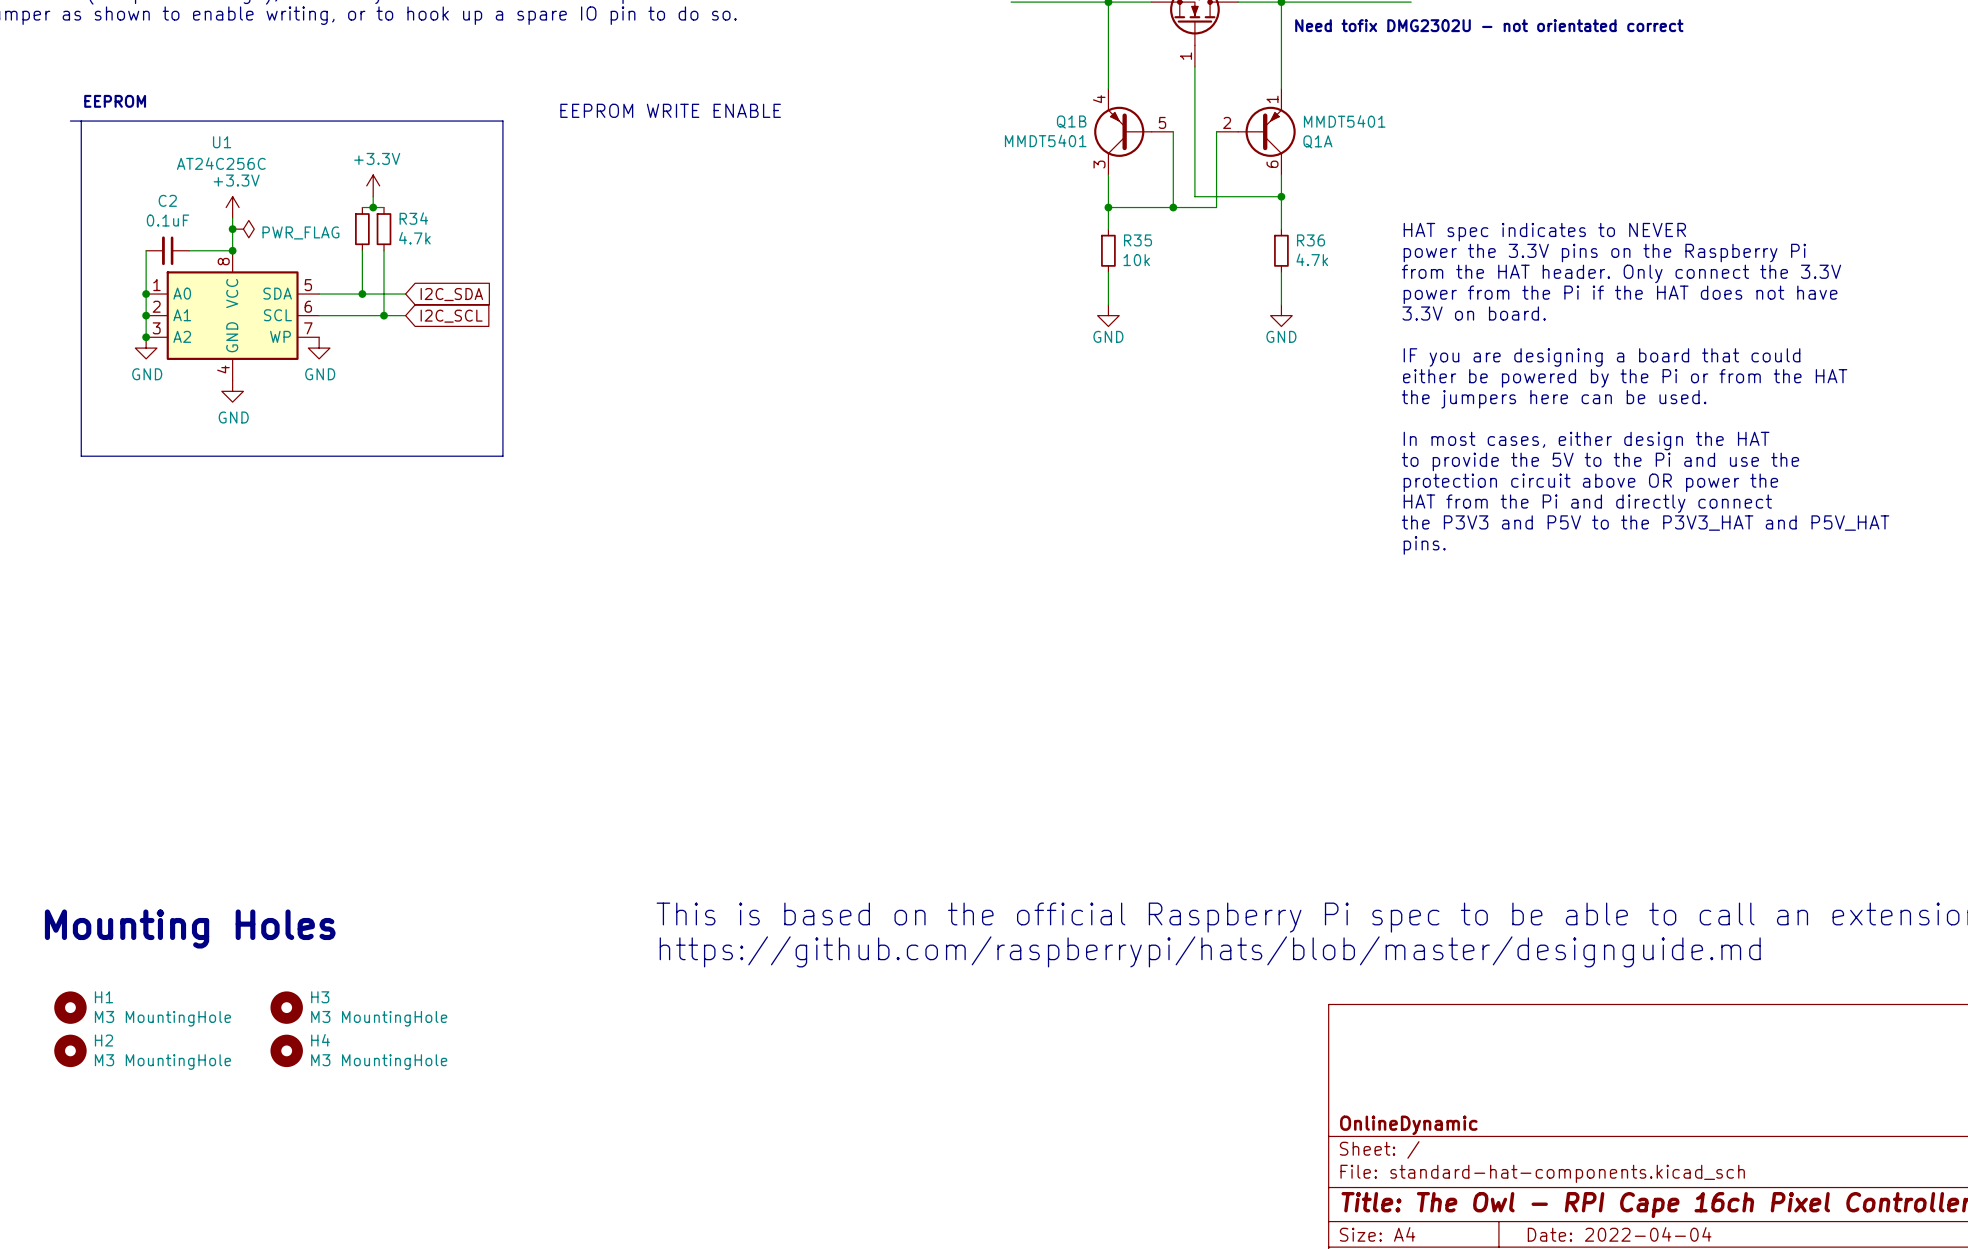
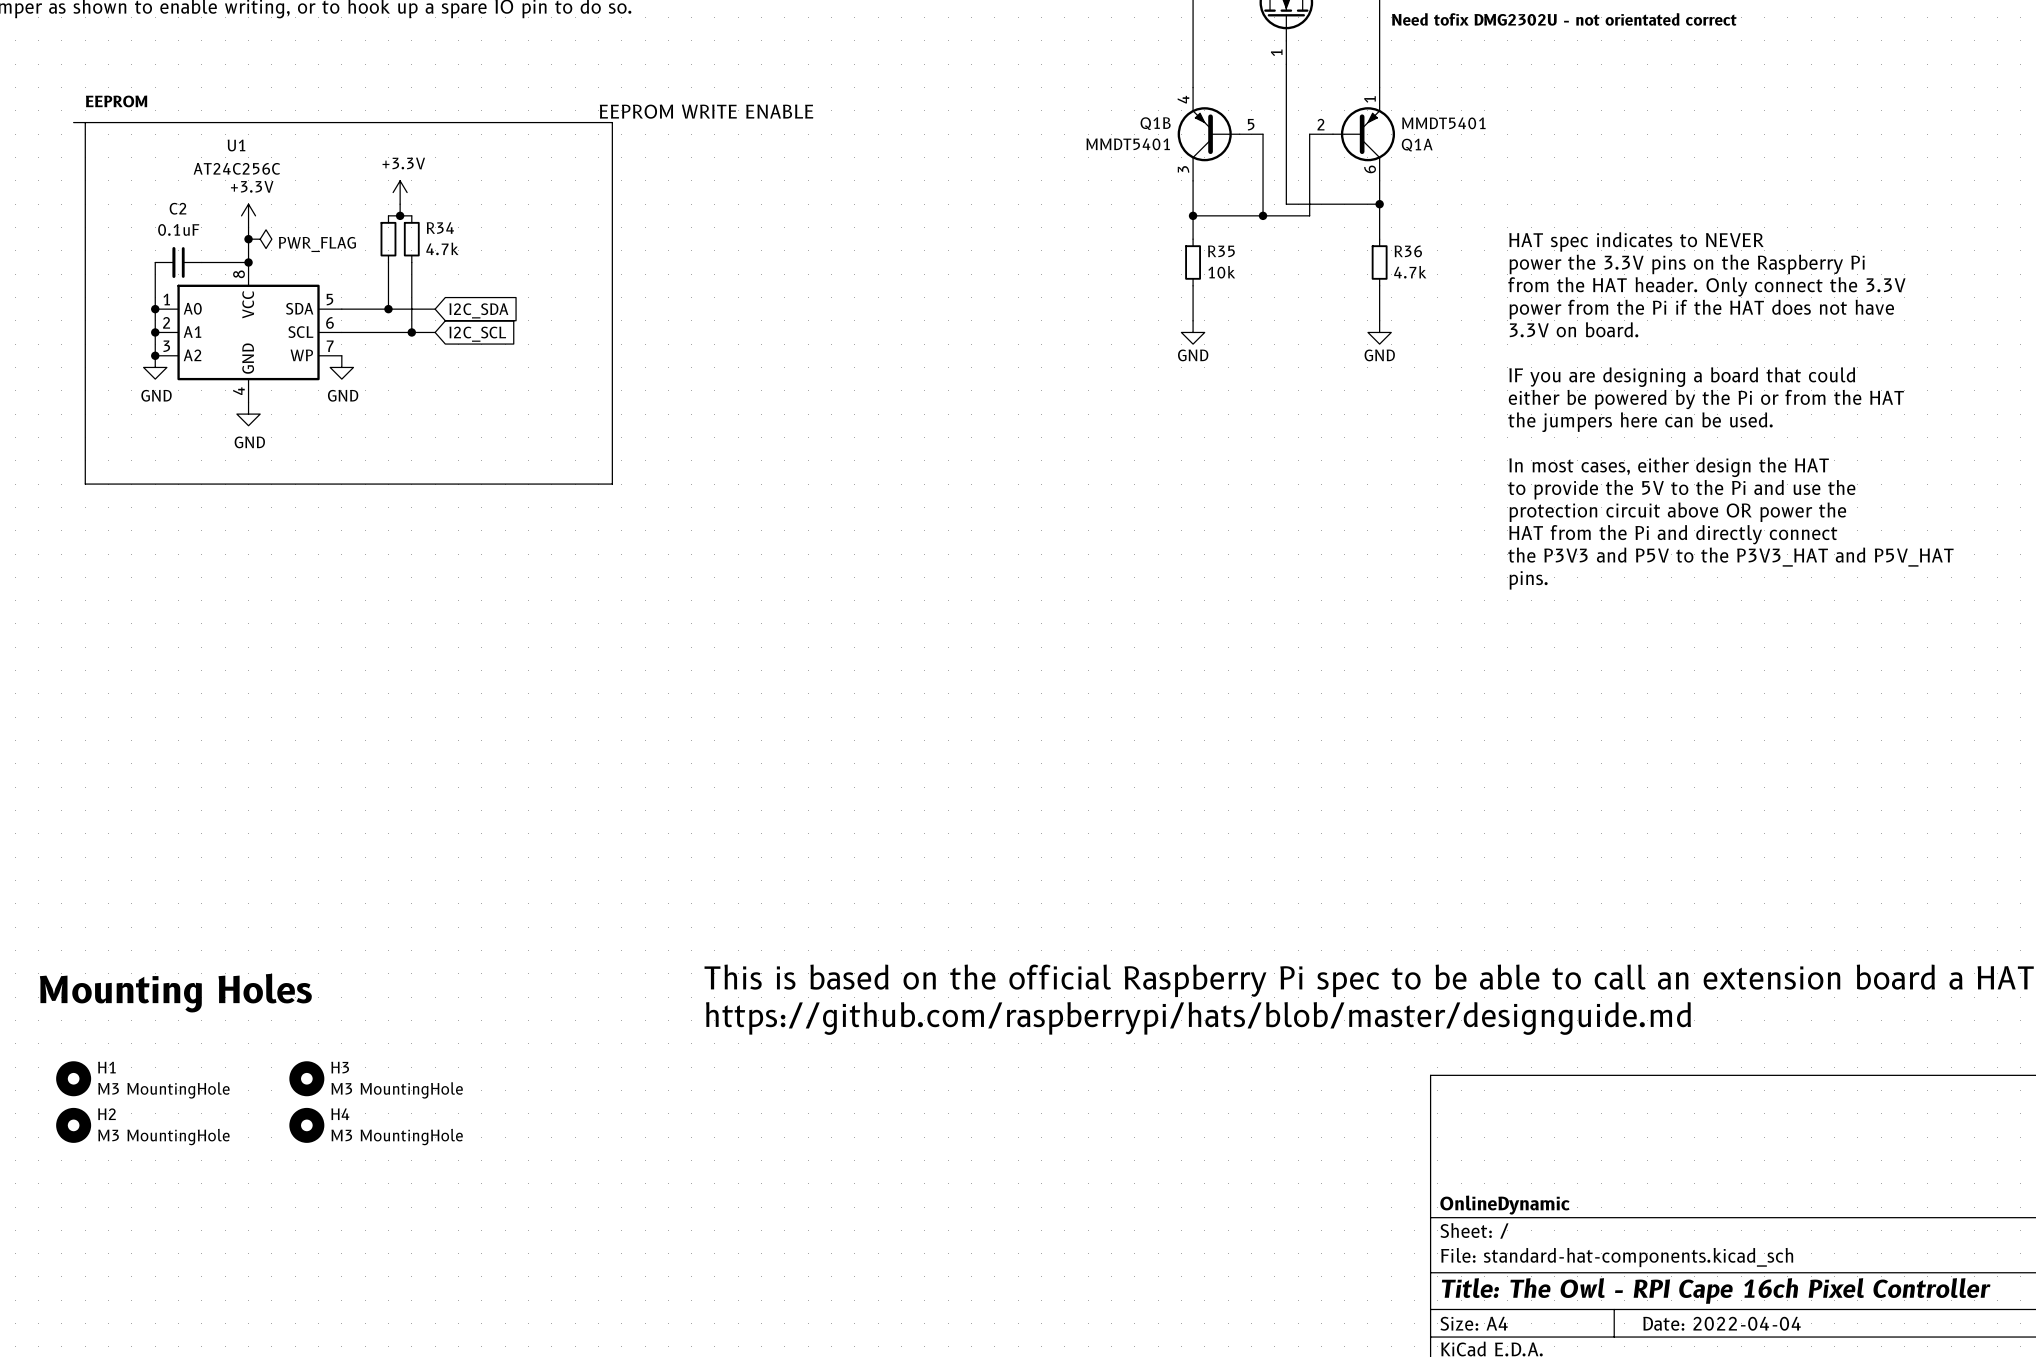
line: (502, 121) (502, 456) -> (540, 122) (612, 122) (612, 484) (540, 484)

